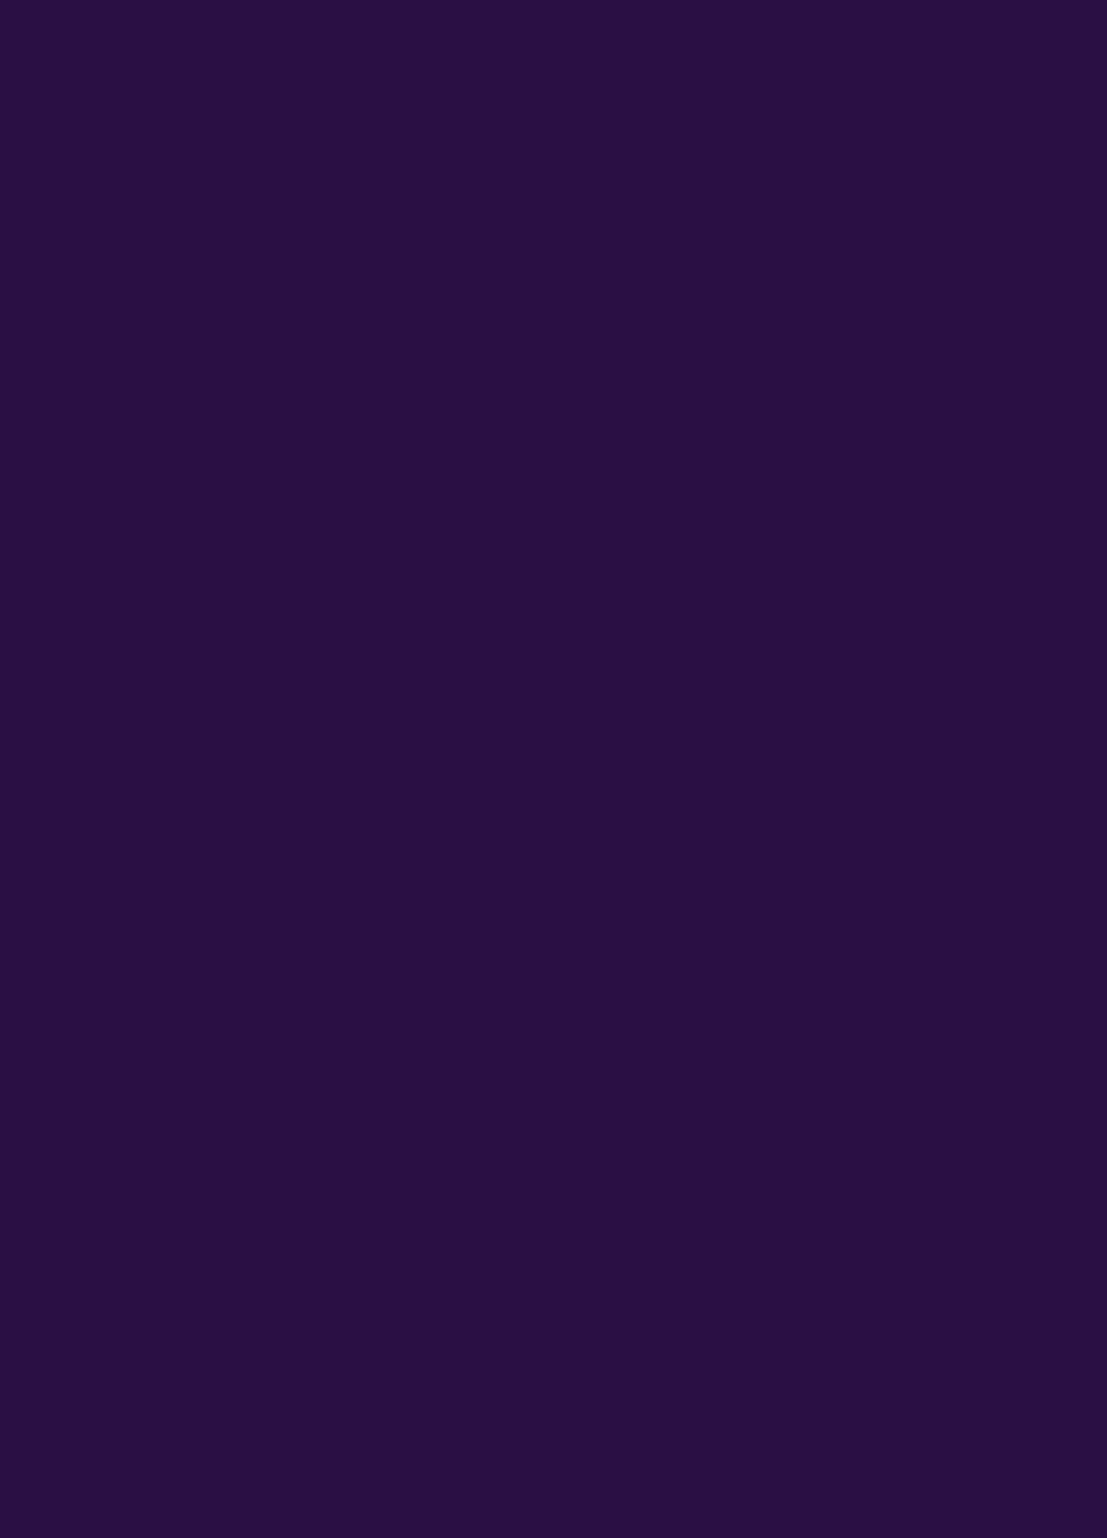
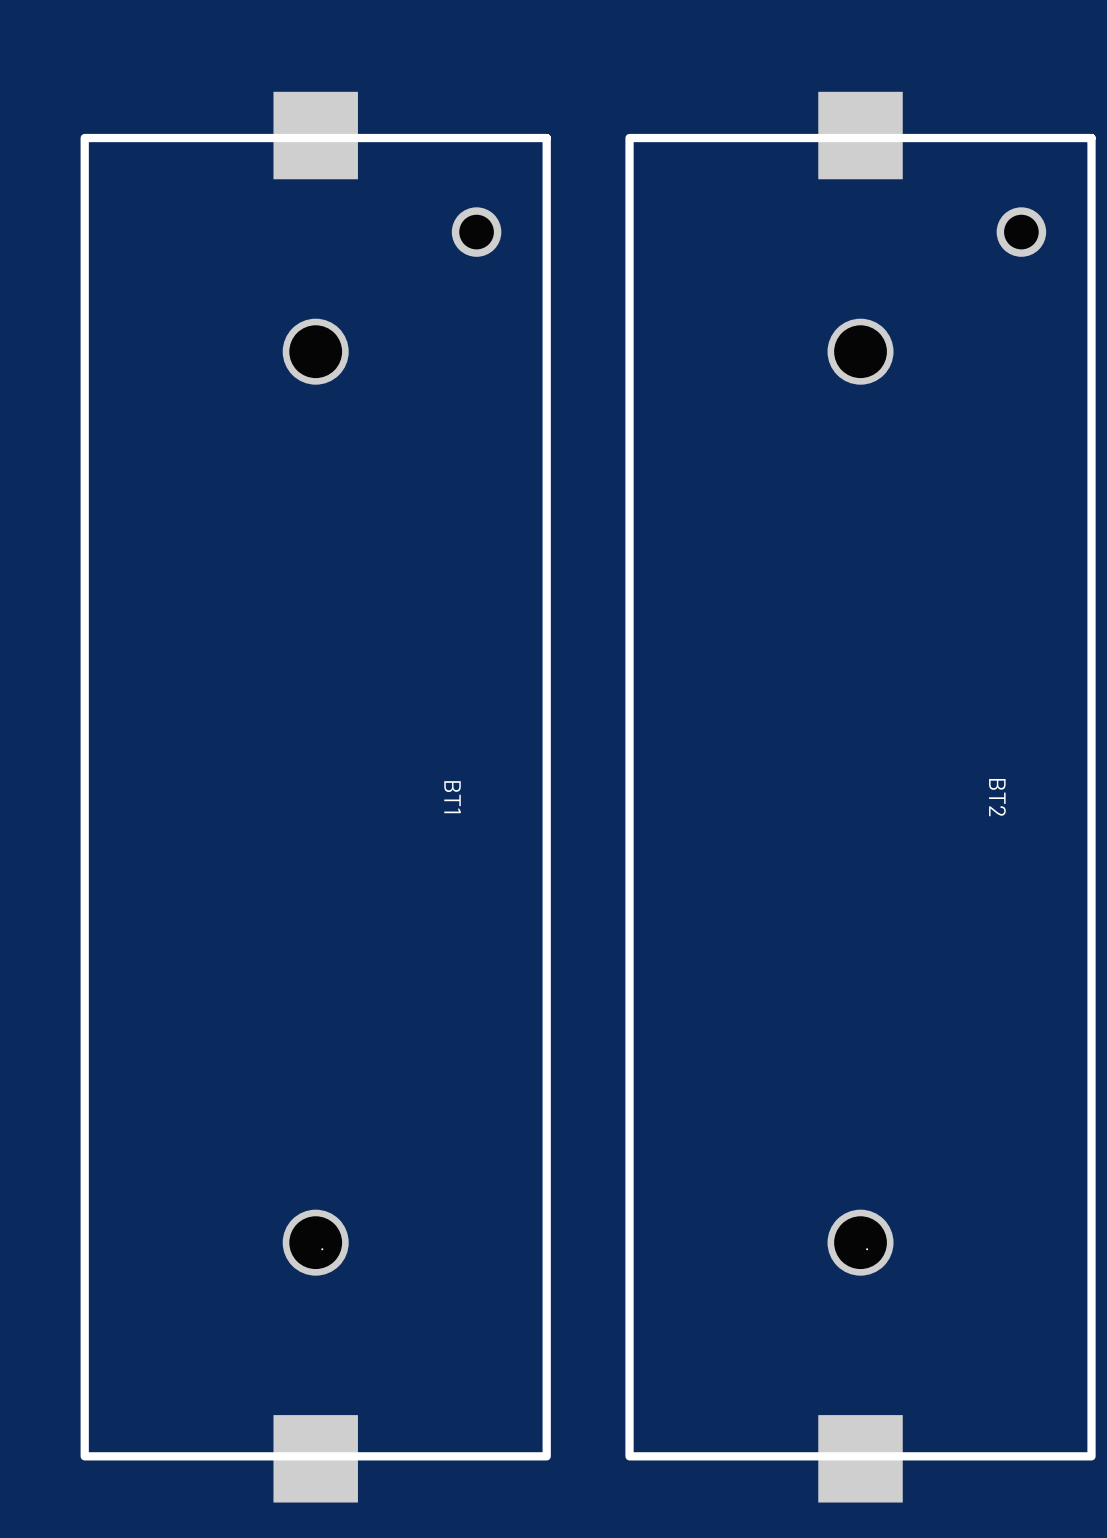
BT1: none -> (315, 797)
BT2: none -> (860, 797)

